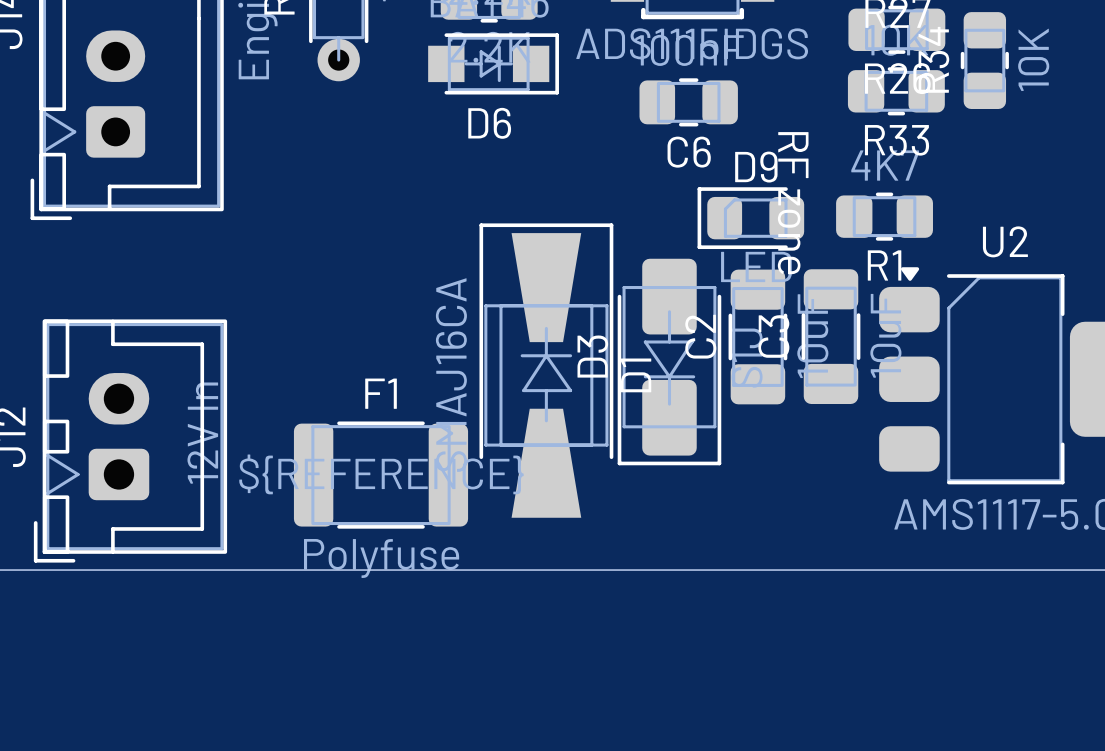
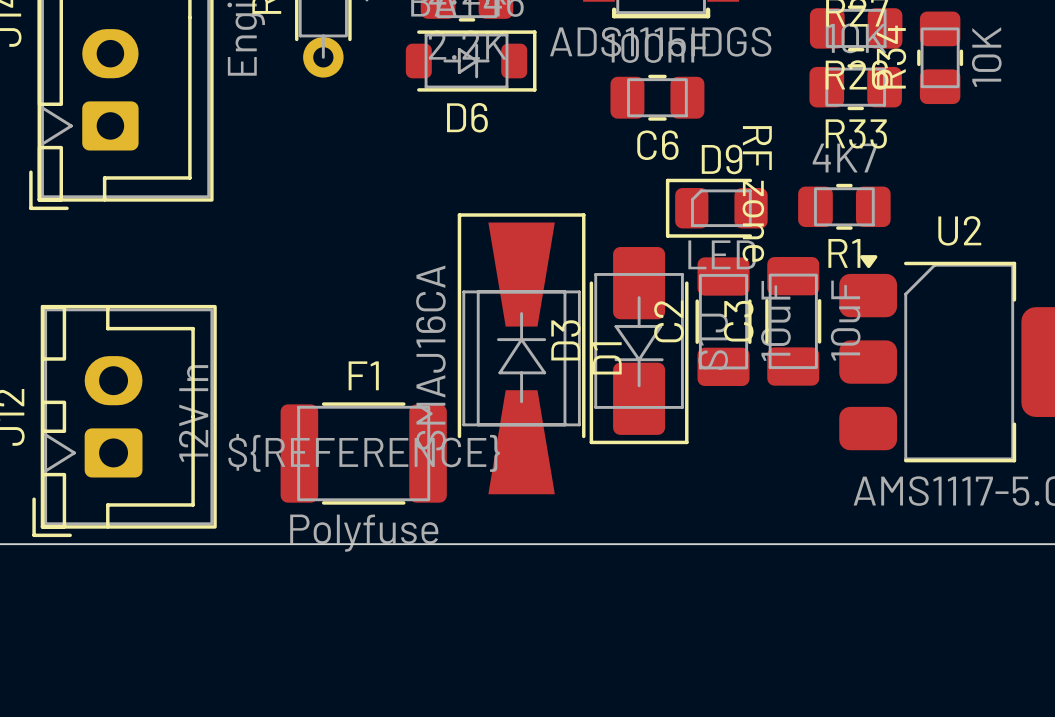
D6 footprint: [428, 33, 559, 95] -> [405, 30, 537, 92]

